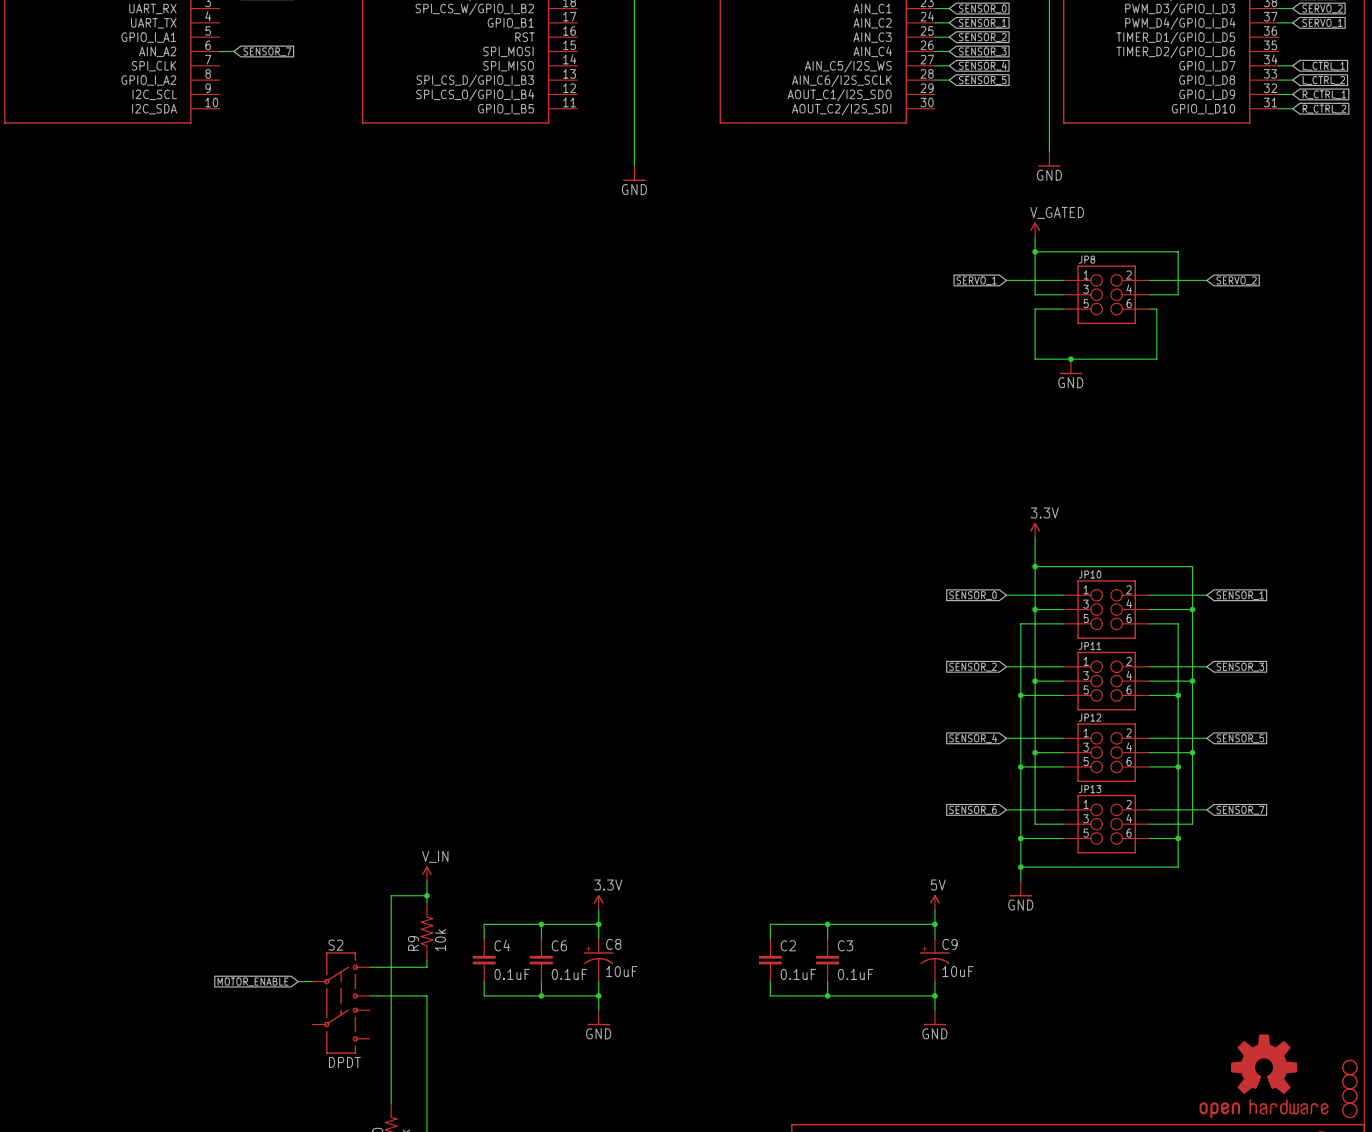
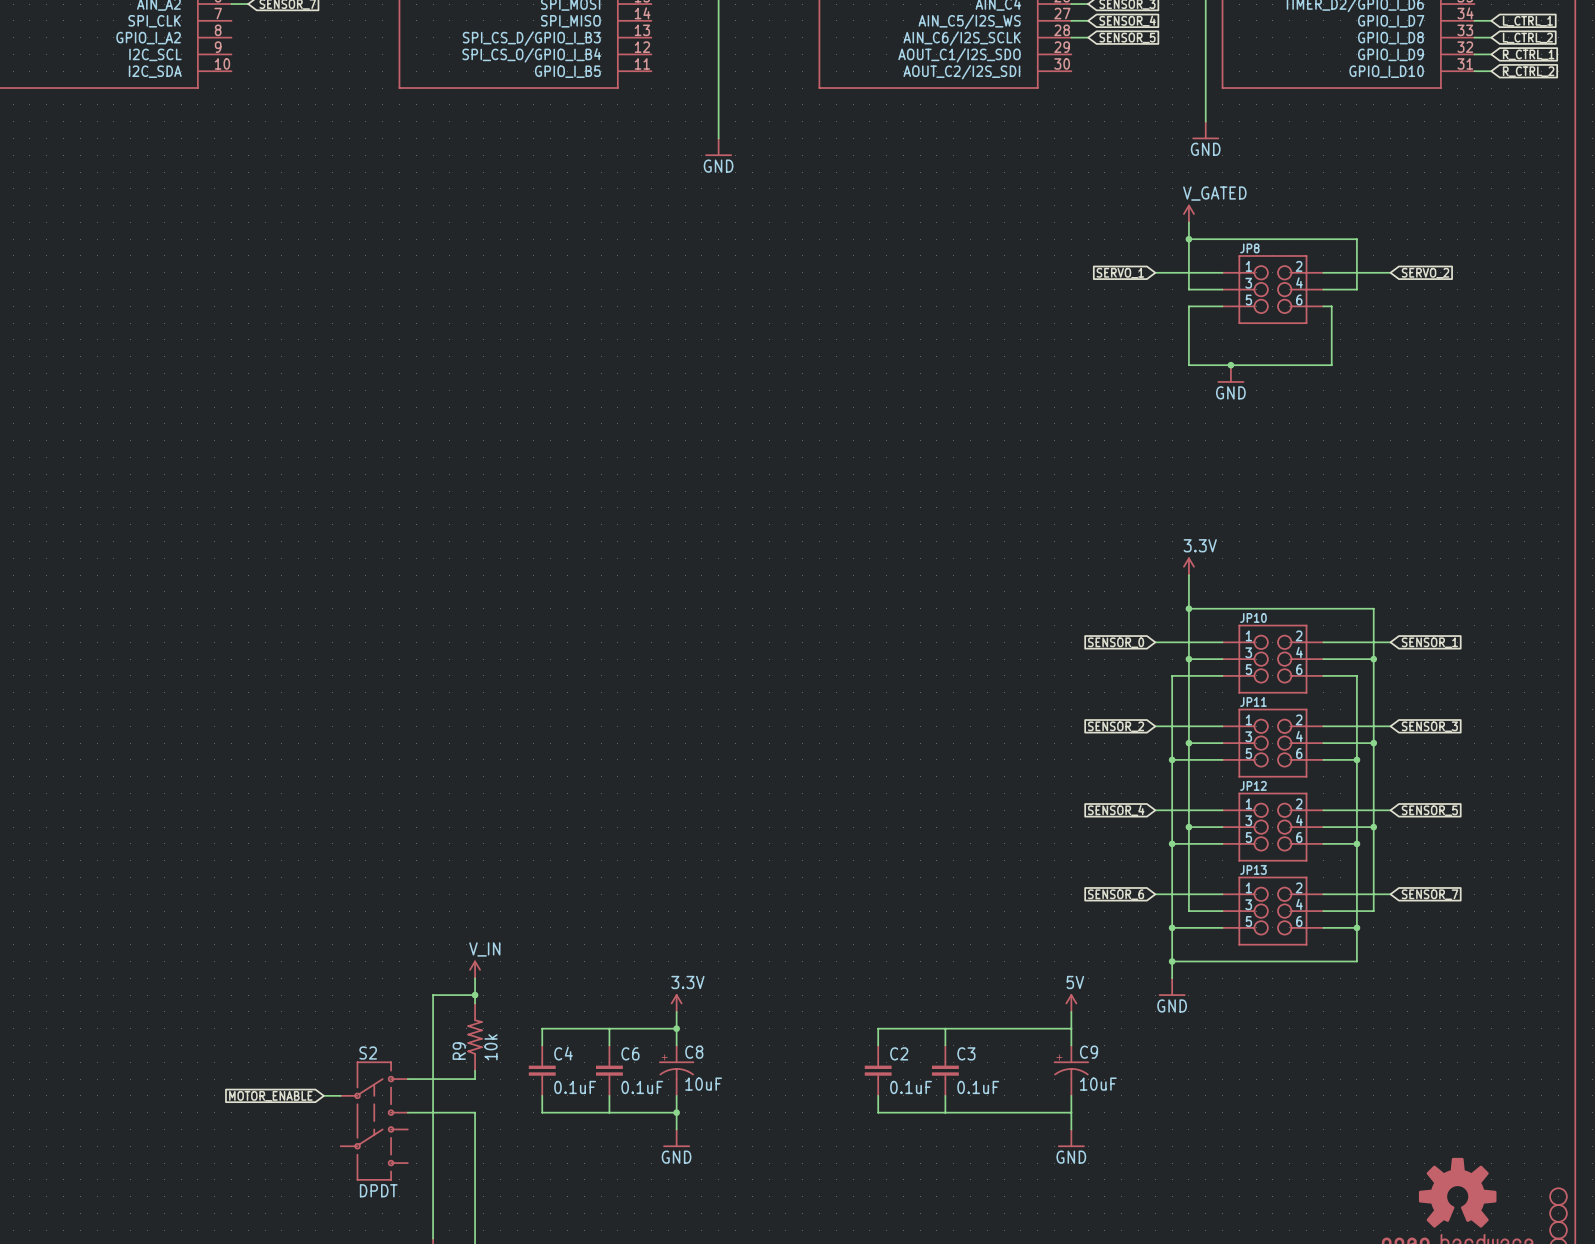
junction: (541, 924) -> none
junction: (827, 924) -> none
junction: (934, 924) -> none
junction: (541, 995) -> none
junction: (827, 995) -> none
junction: (934, 995) -> none

